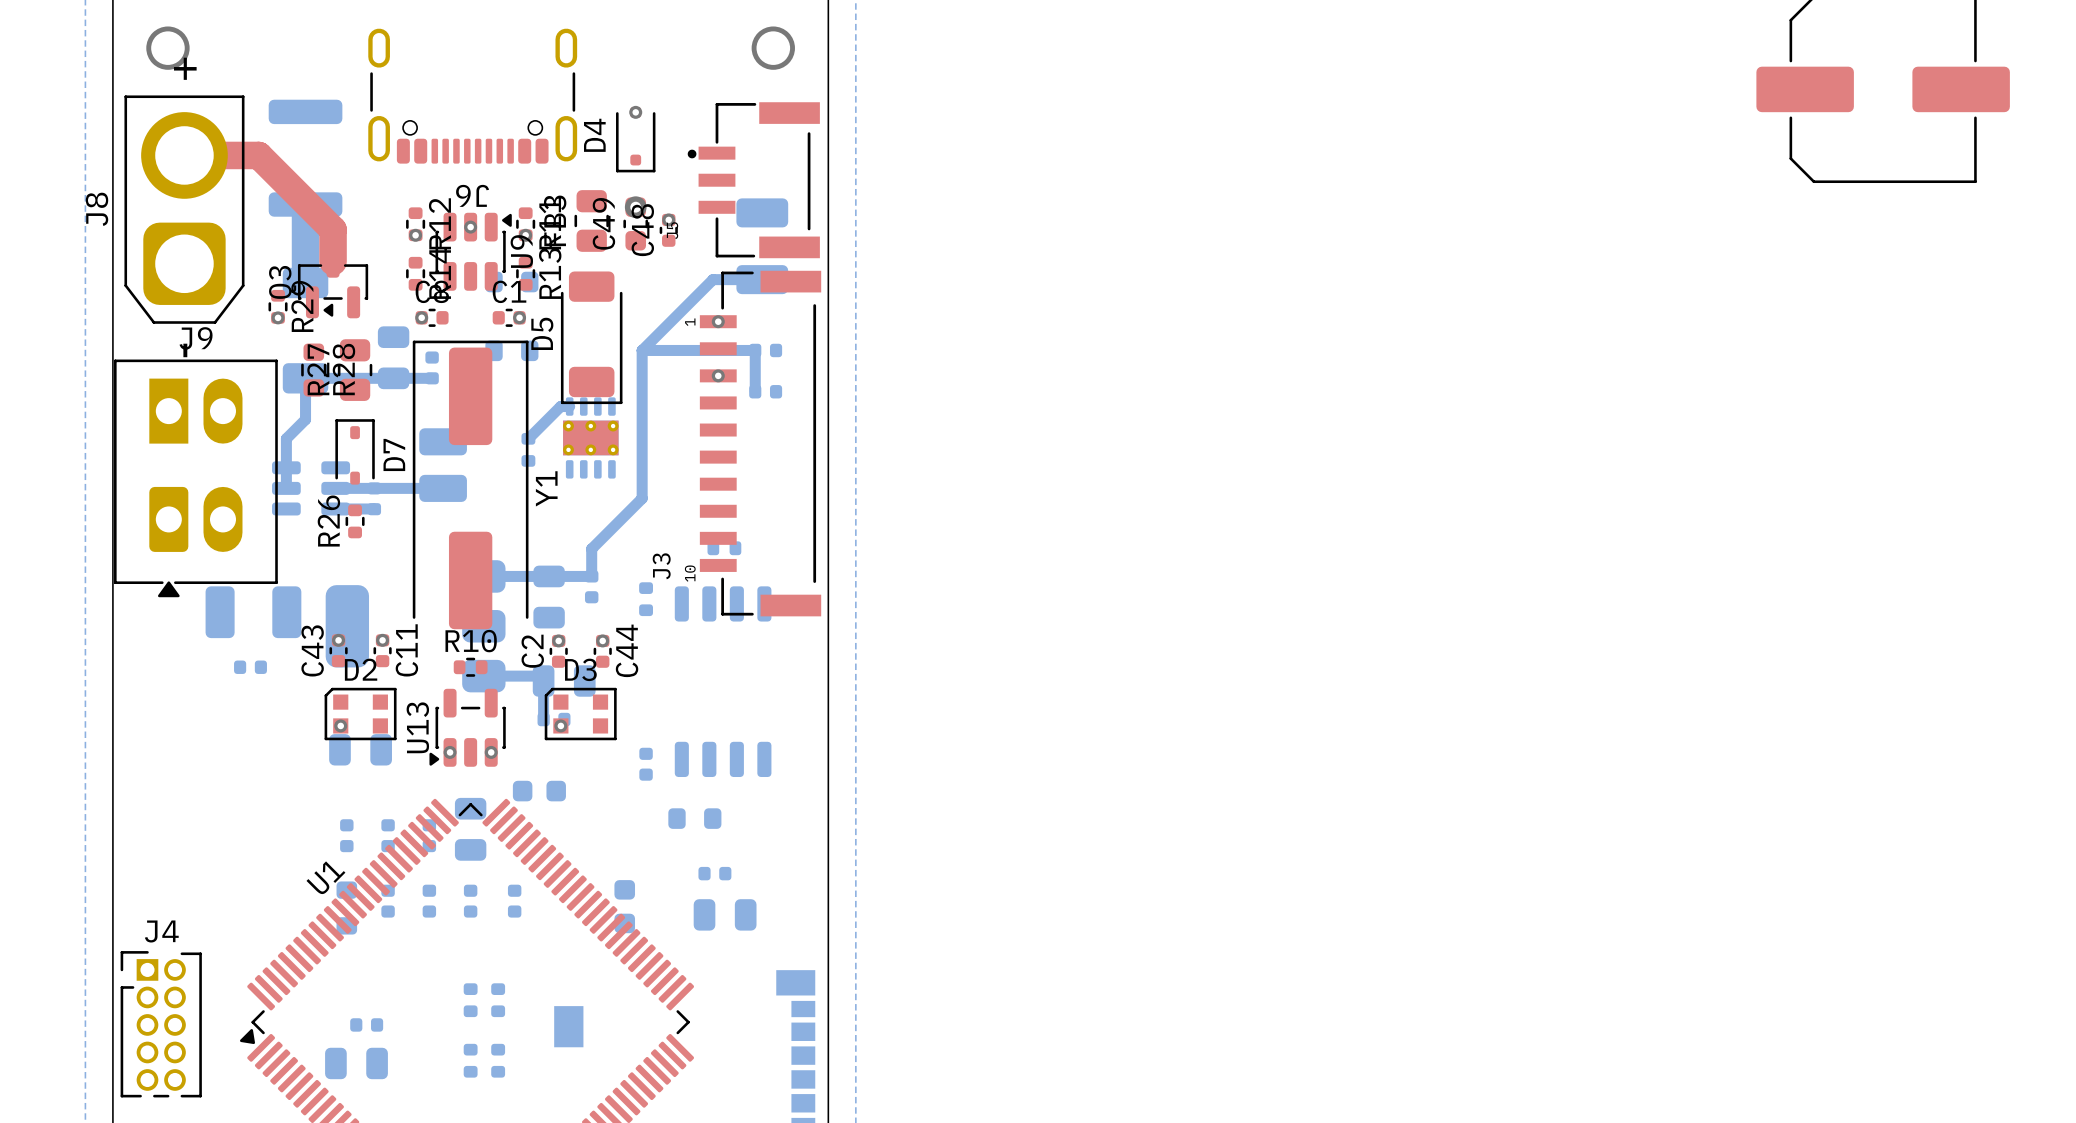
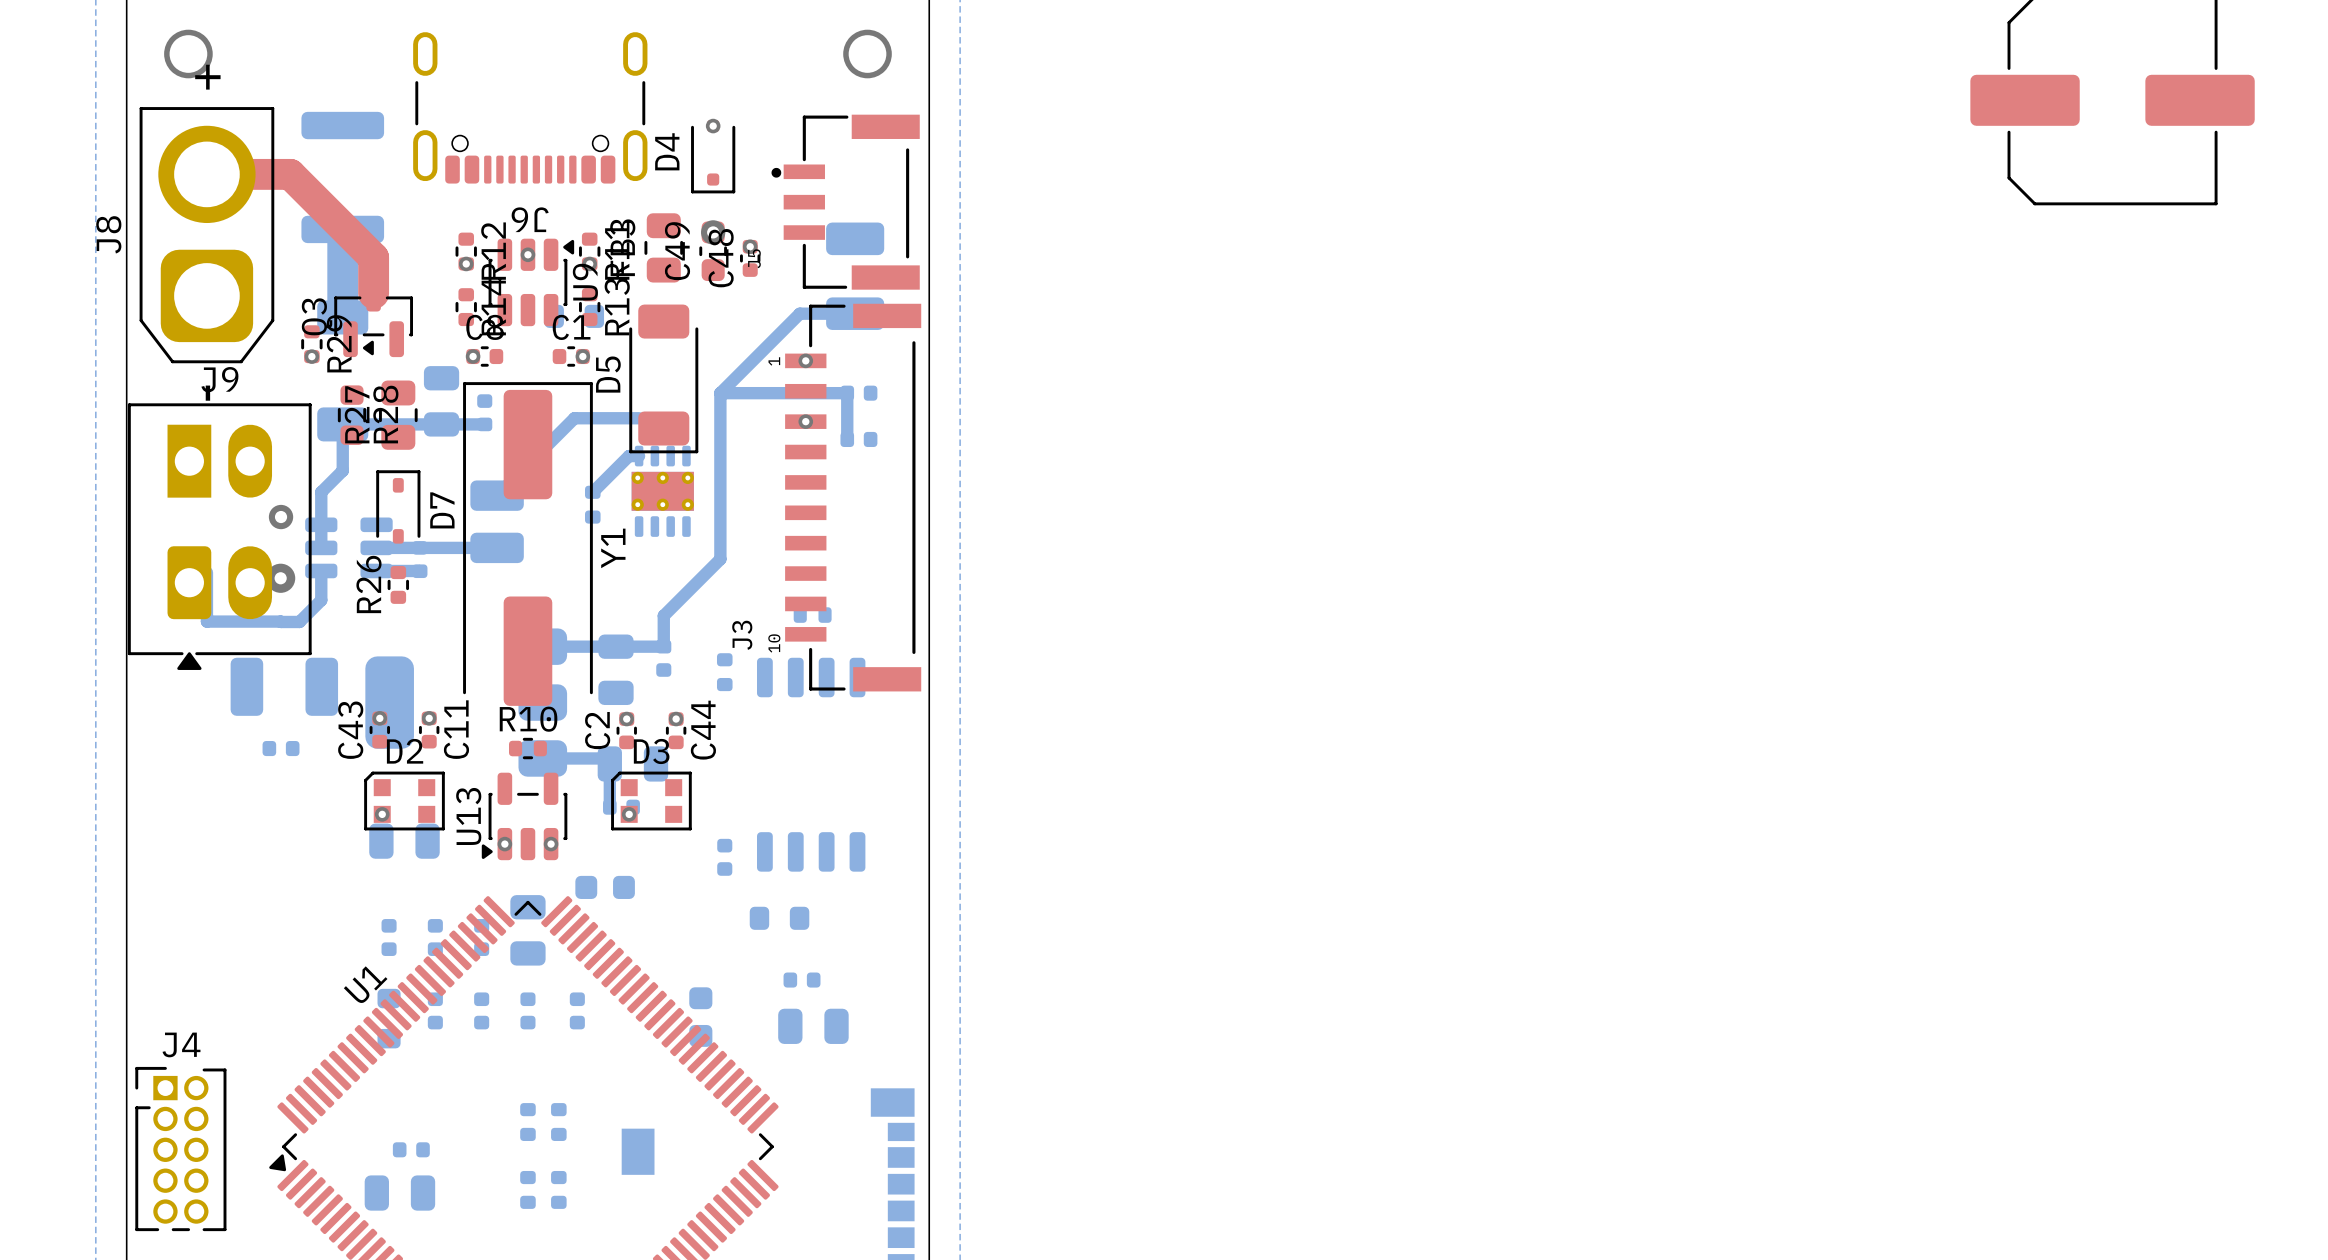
part: (511, 350) -> none
bottom track: none -> (639, 418) (574, 418) (497, 495)
via: none -> (281, 517)
bottom track: none -> (321, 570) (321, 600) (299, 621) (206, 621) (206, 572)
via: none -> (280, 578)

